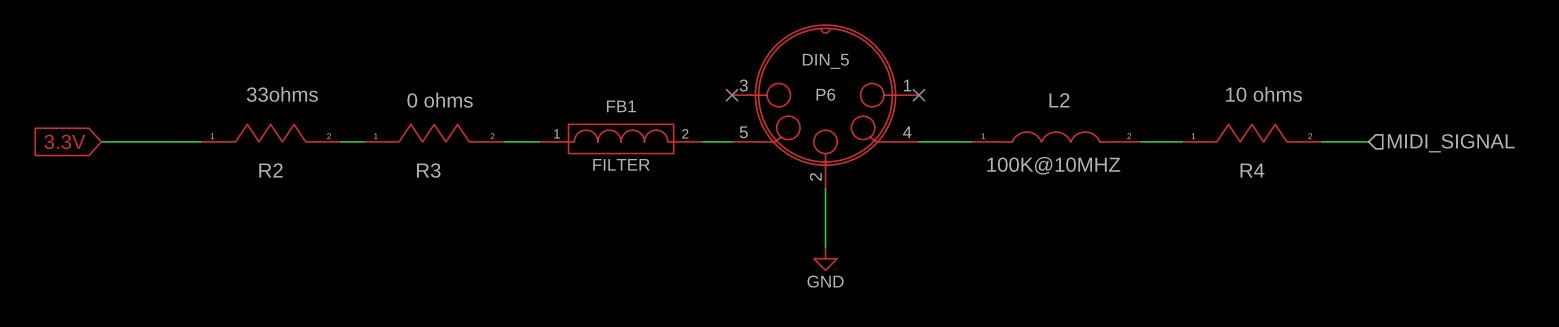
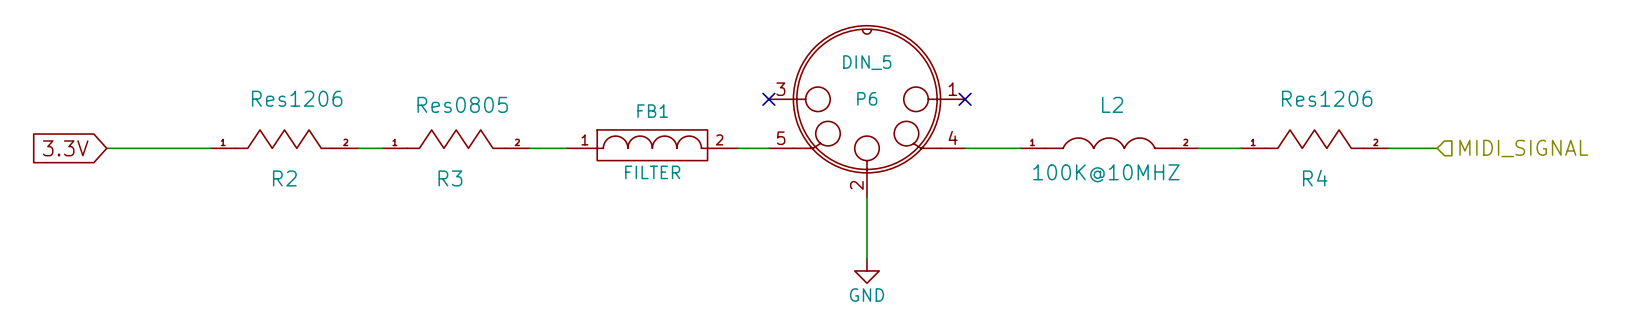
R2 value: 33ohms (282, 94) -> Res1206 (297, 98)
R4 value: 10 ohms (1263, 94) -> Res1206 (1327, 98)
R3 value: 0 ohms (440, 100) -> Res0805 (462, 104)

